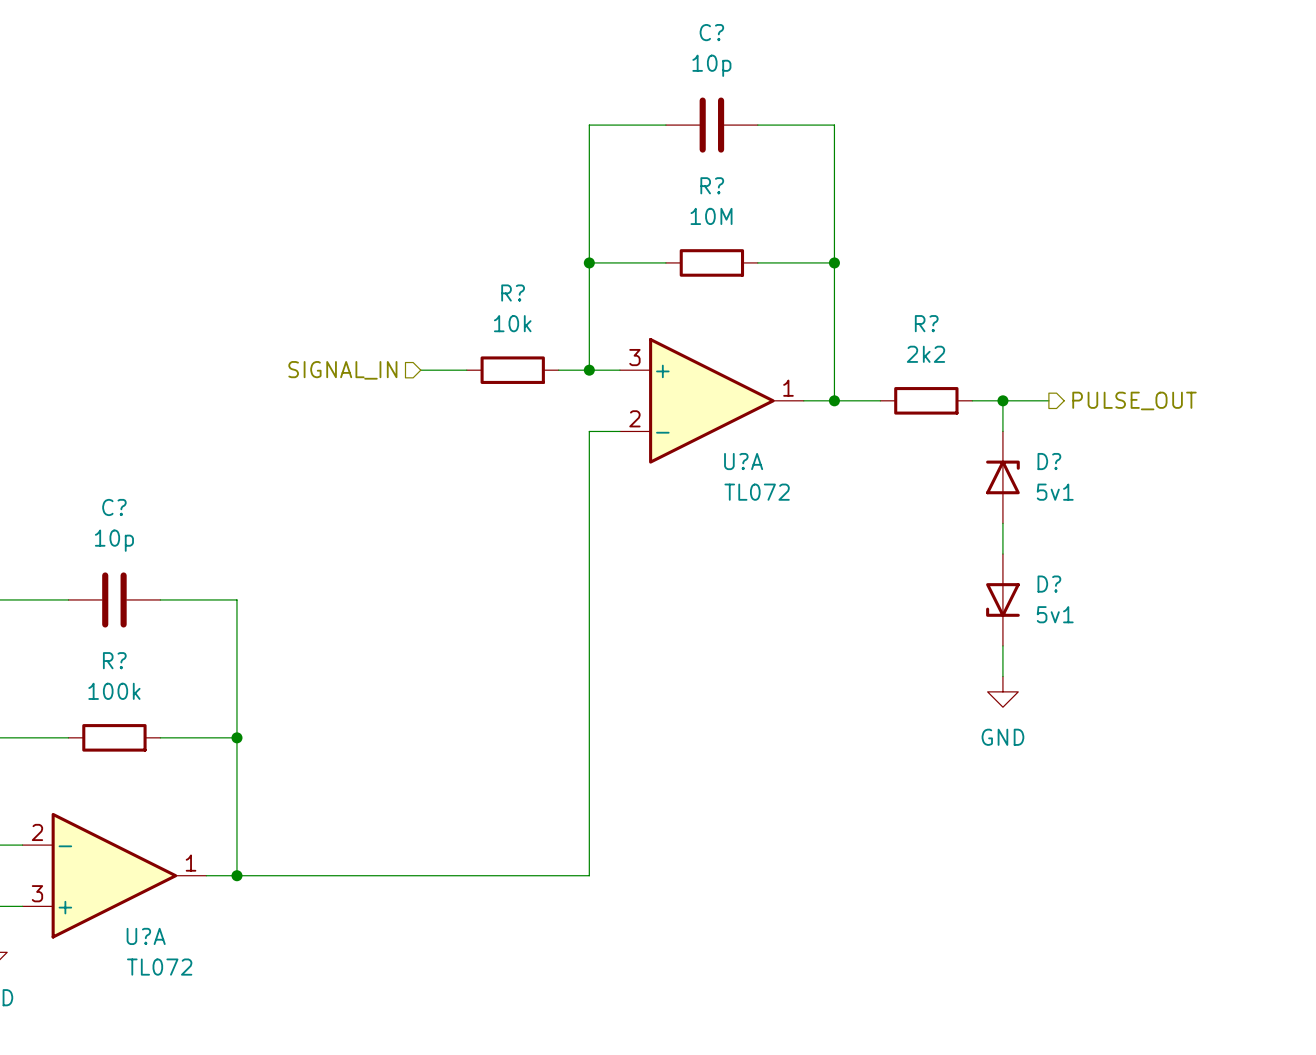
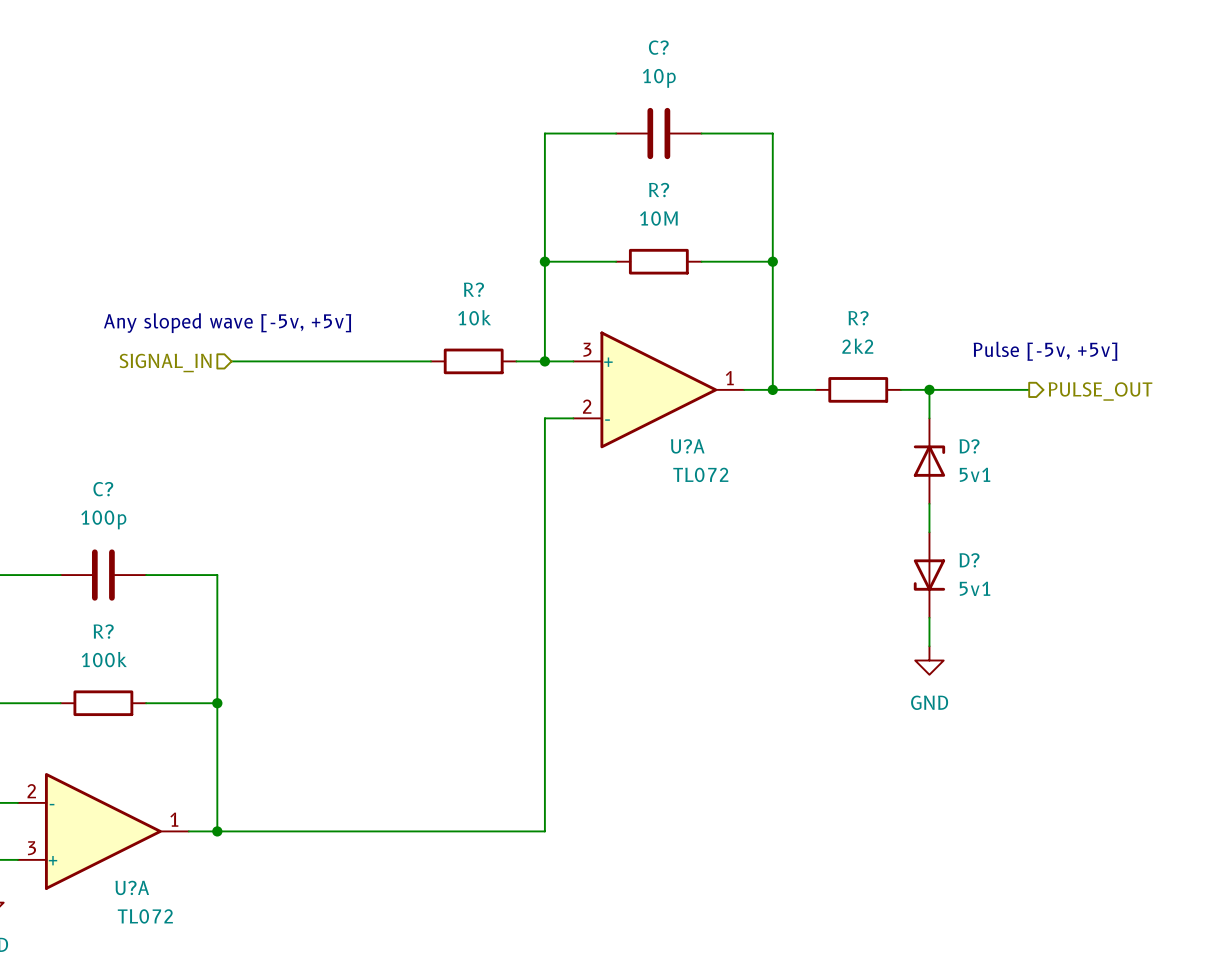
text: none -> Any sloped wave [-5v, +5v] (227, 323)
text: none -> Pulse [-5v, +5v] (1045, 351)
wire: none -> (231, 361) (388, 361)
hierarchical label position: SIGNAL_IN (342, 370) -> SIGNAL_IN (165, 363)
wire: none -> (972, 389) (1029, 389)
hierarchical label position: PULSE_OUT (1134, 400) -> PULSE_OUT (1100, 391)
C? value: 10p (114, 540) -> 100p (103, 519)

